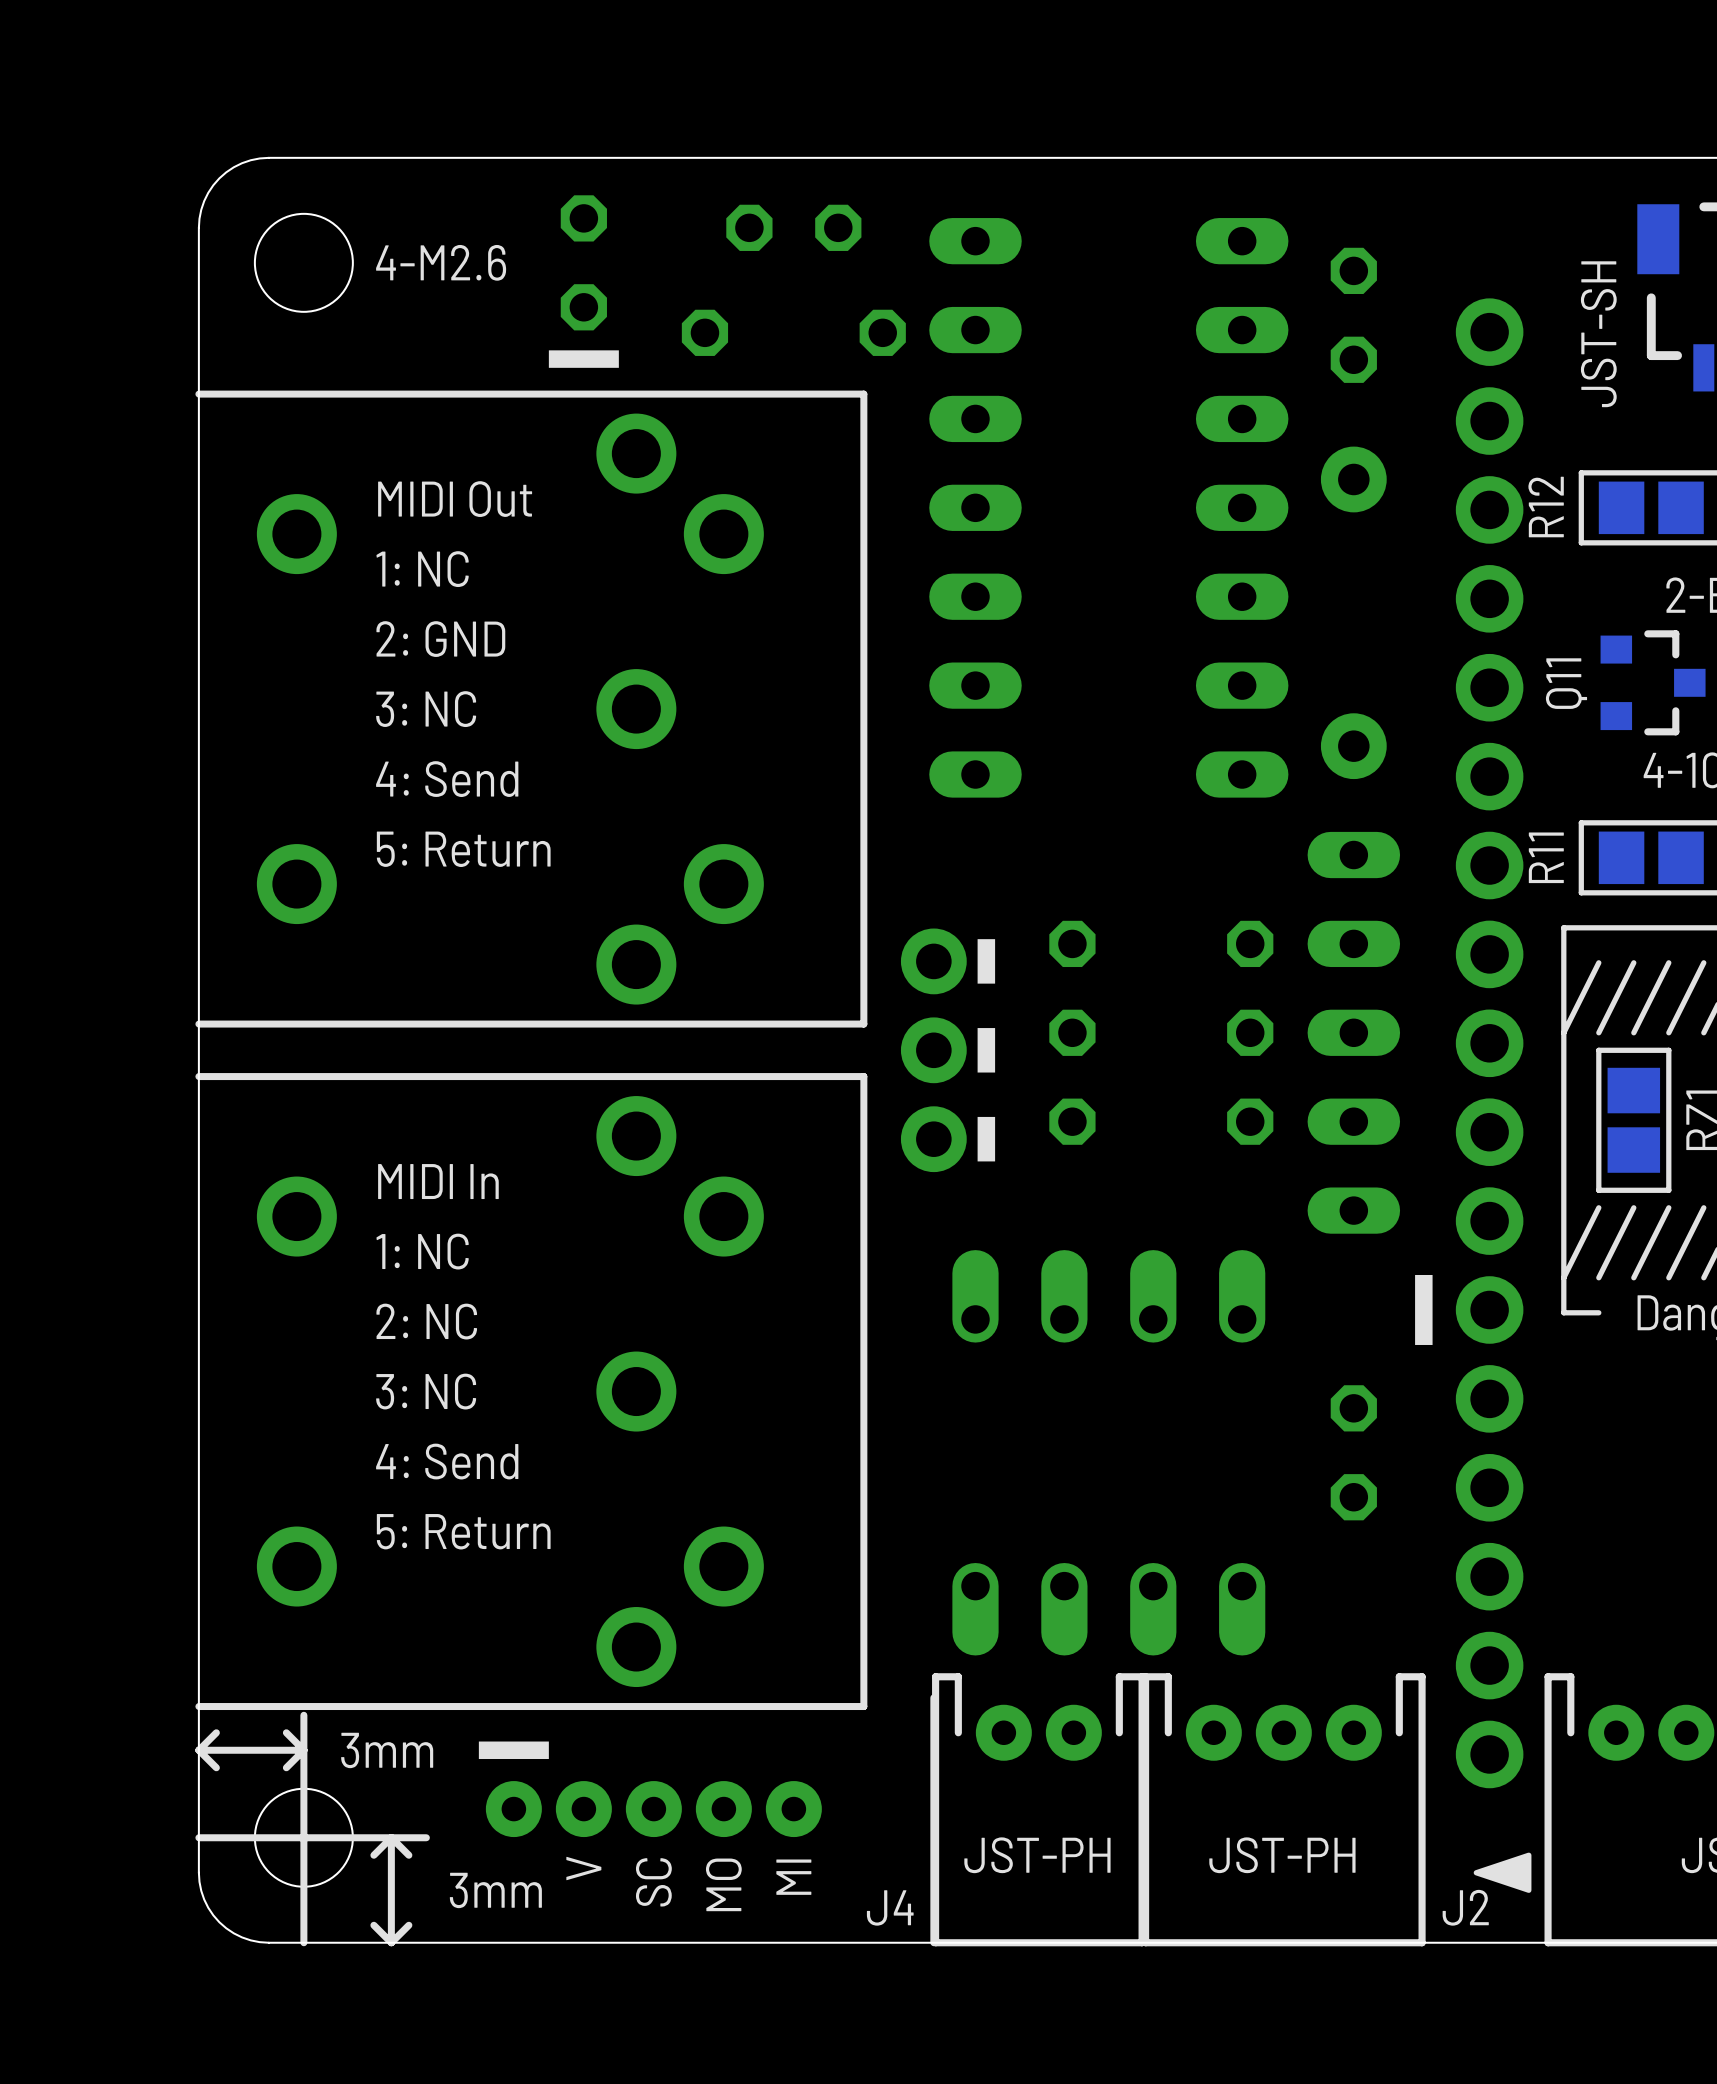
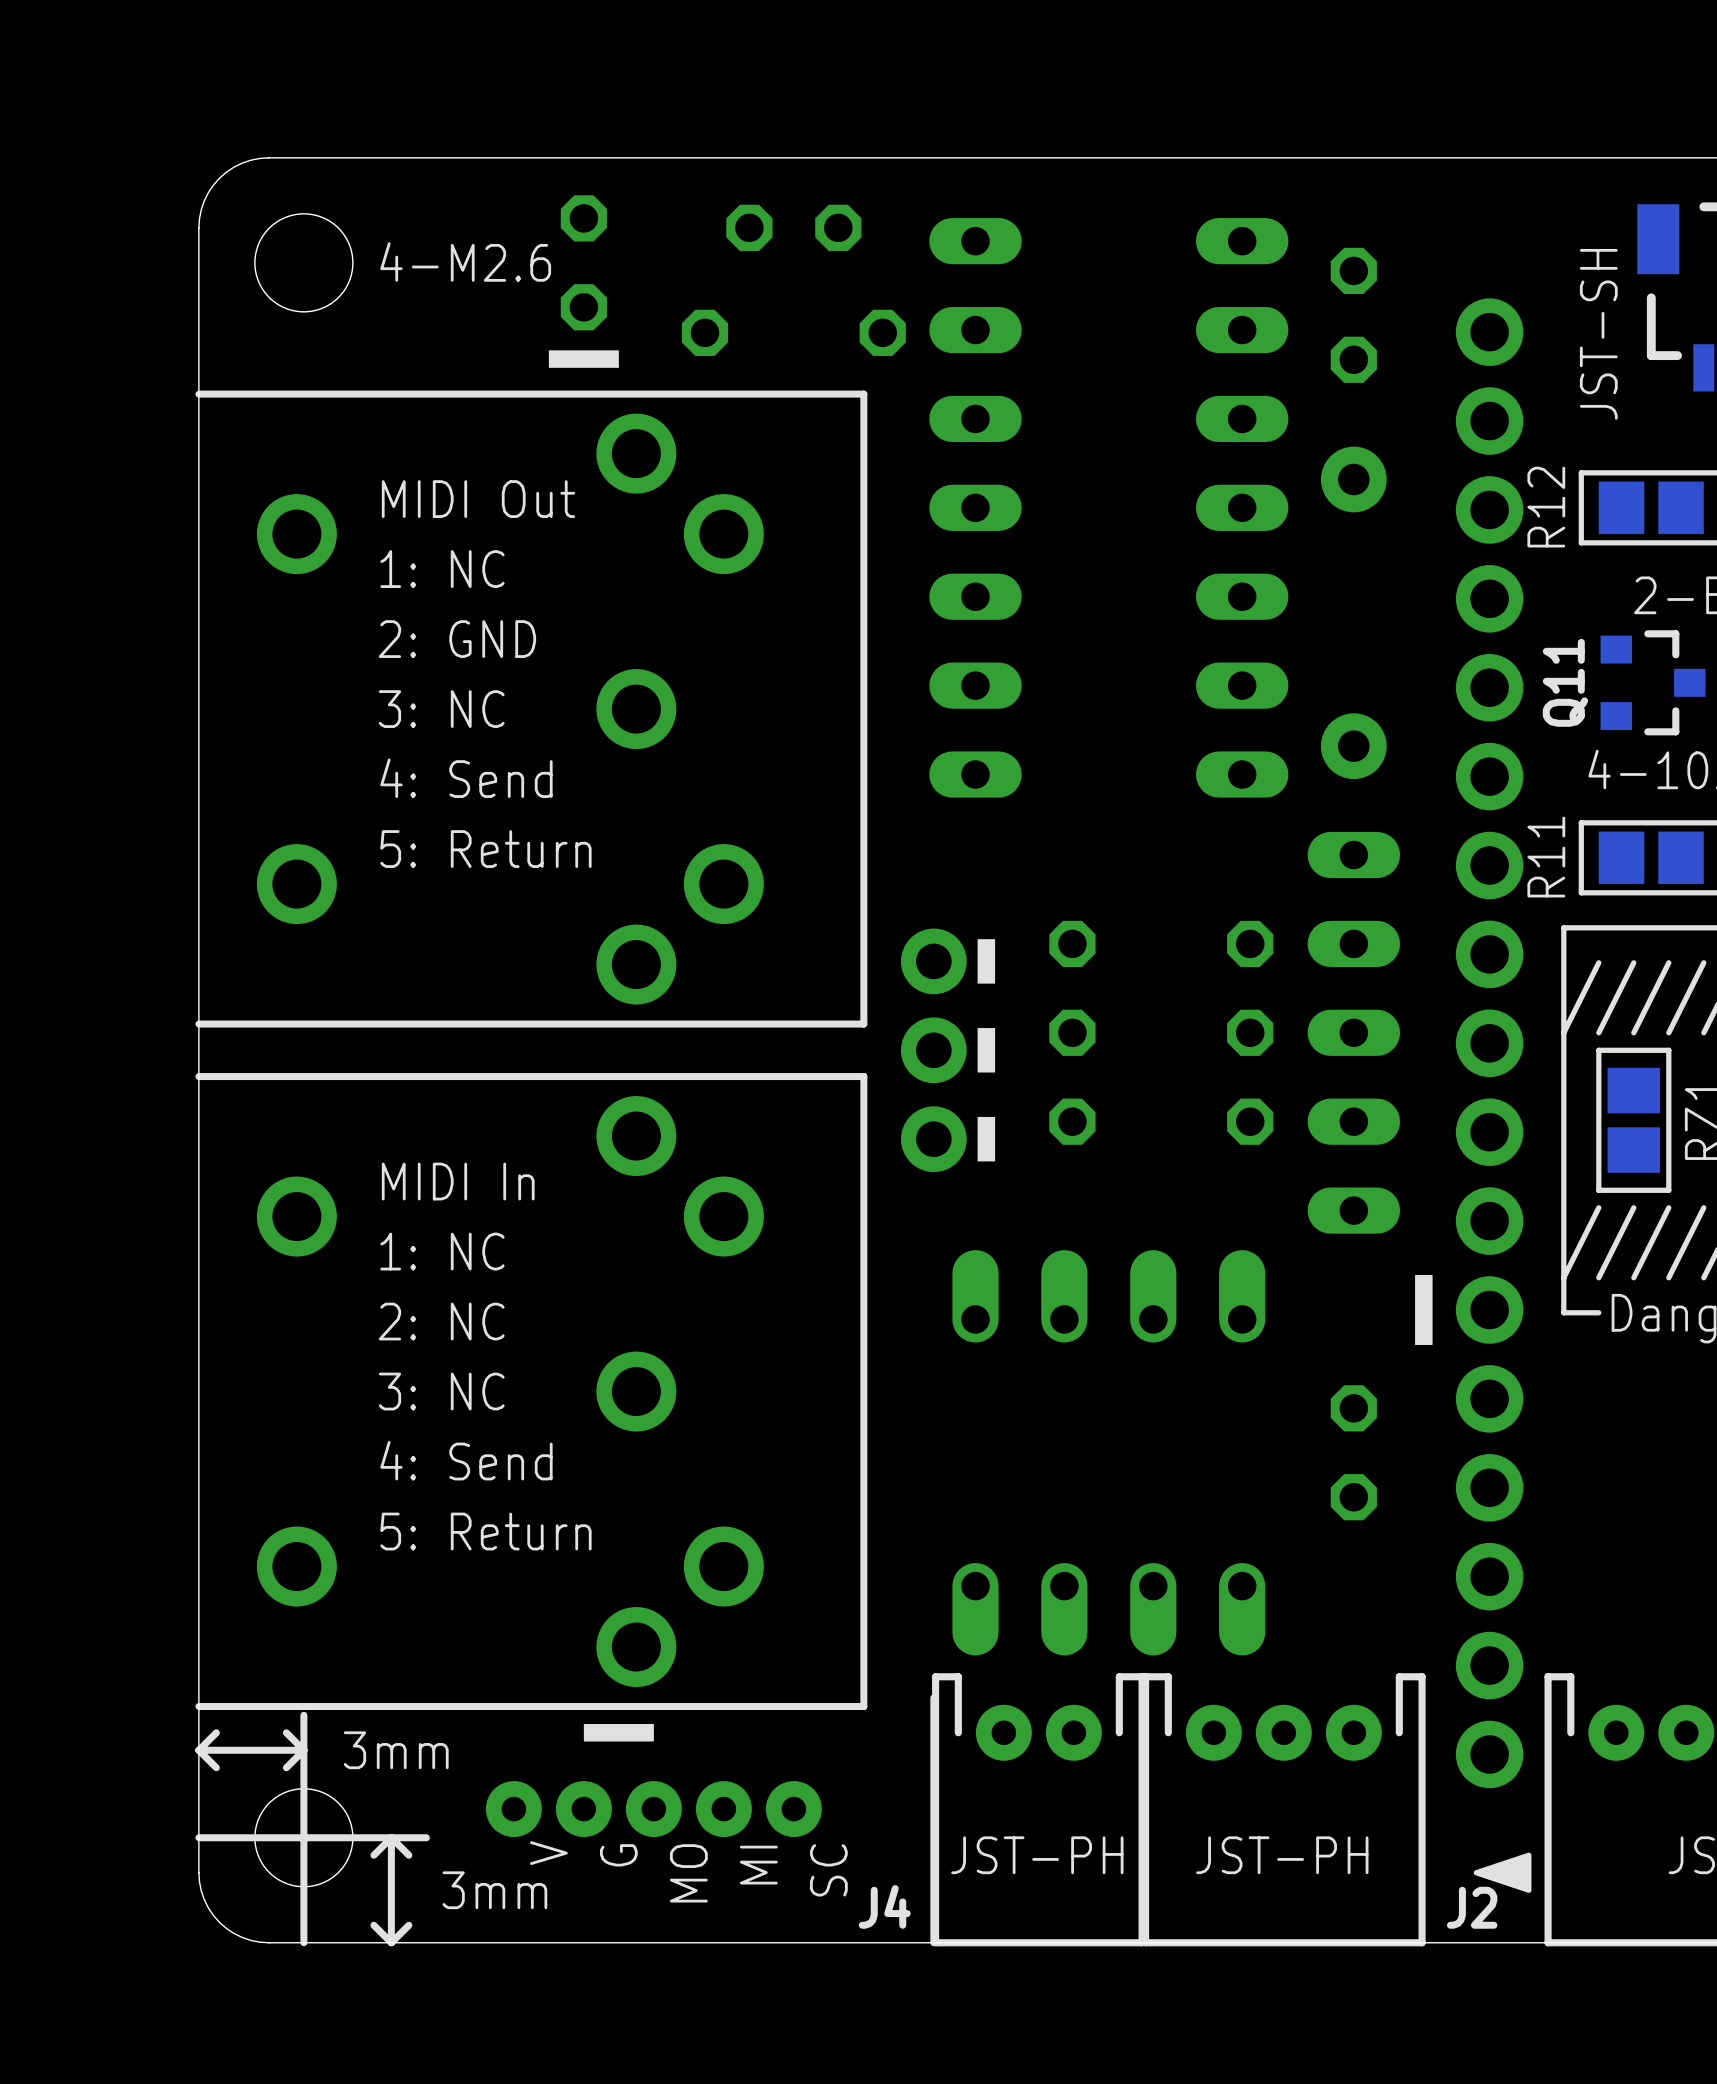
drawing position: (513, 1750) -> (618, 1732)
text: none -> G (618, 1855)
text position: V (583, 1868) -> V (548, 1853)
text position: MI (793, 1877) -> MI (758, 1865)
text position: SC (653, 1882) -> SC (828, 1870)
text position: MO (723, 1884) -> MO (688, 1873)

